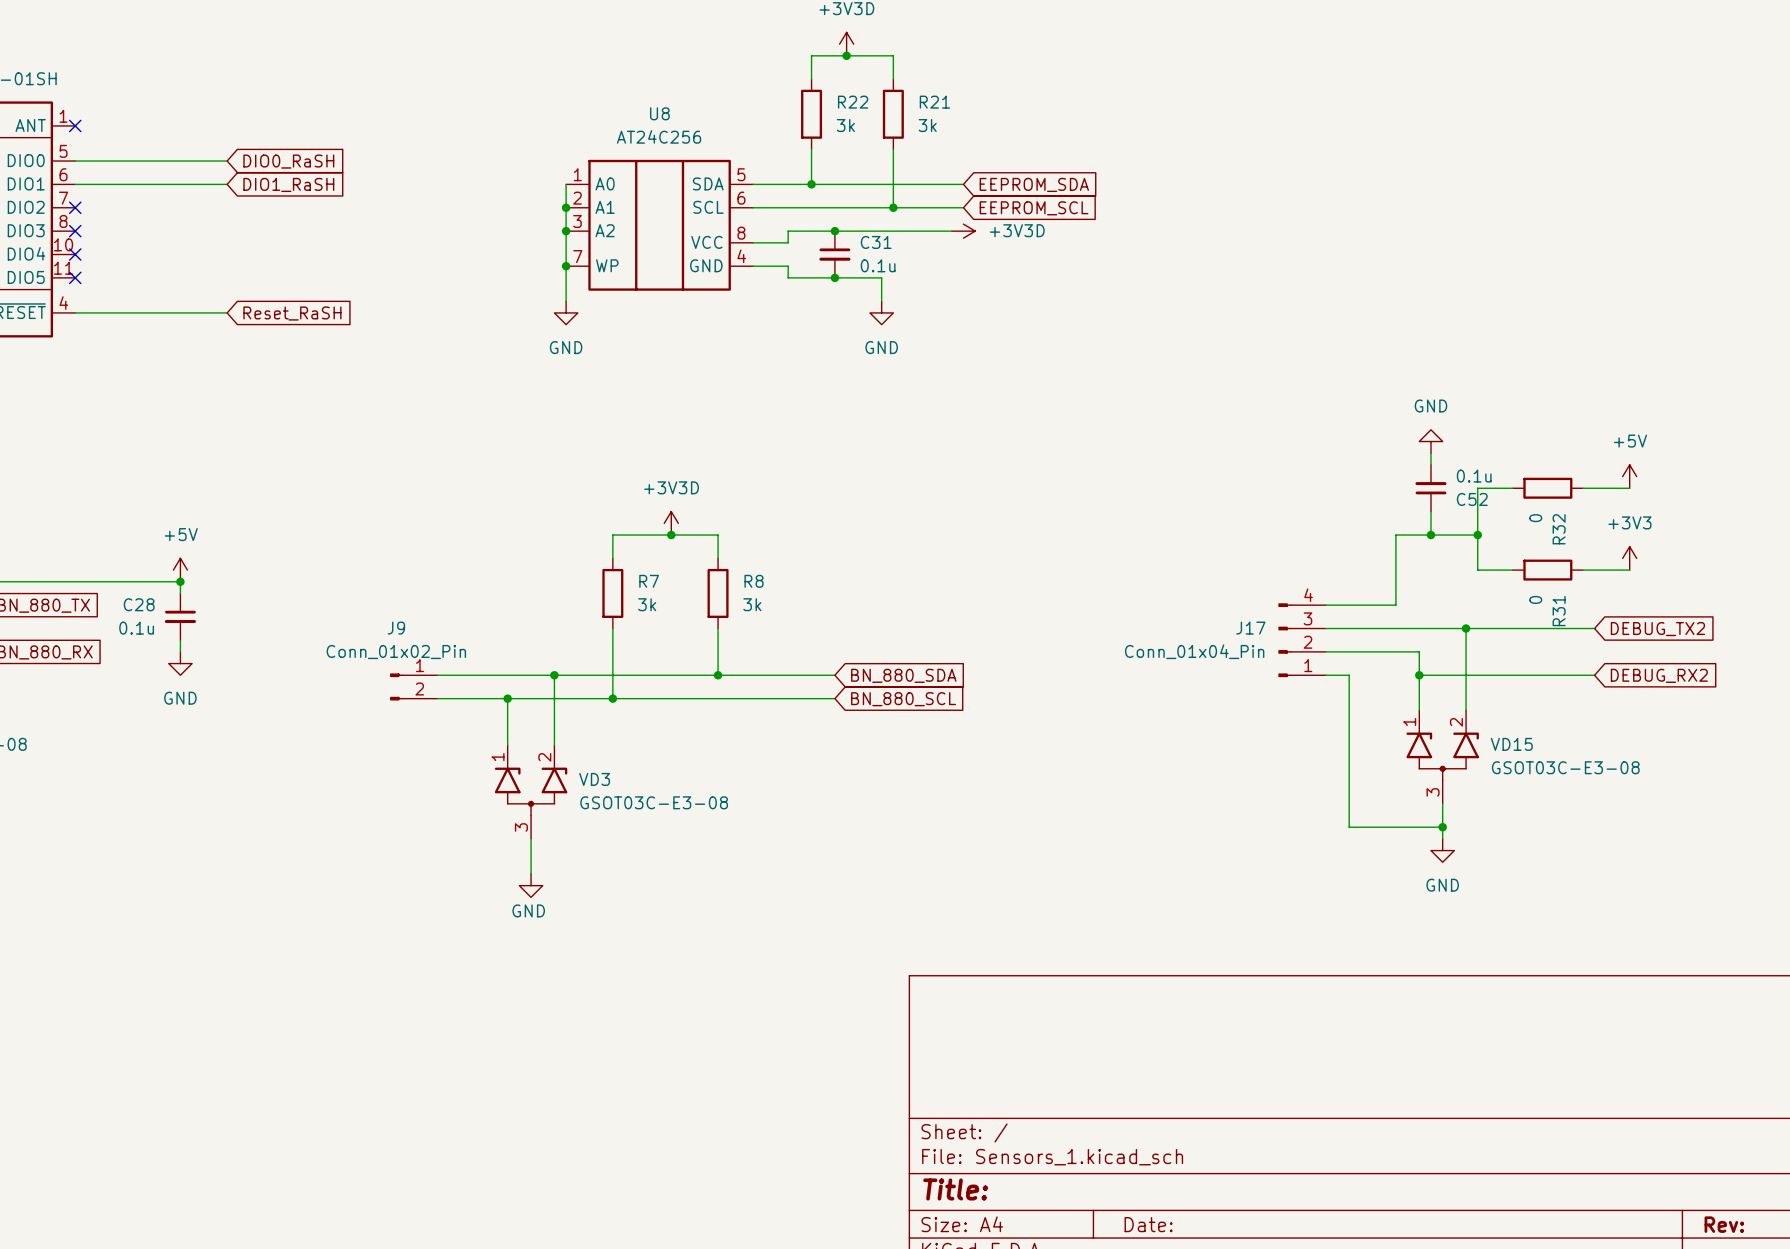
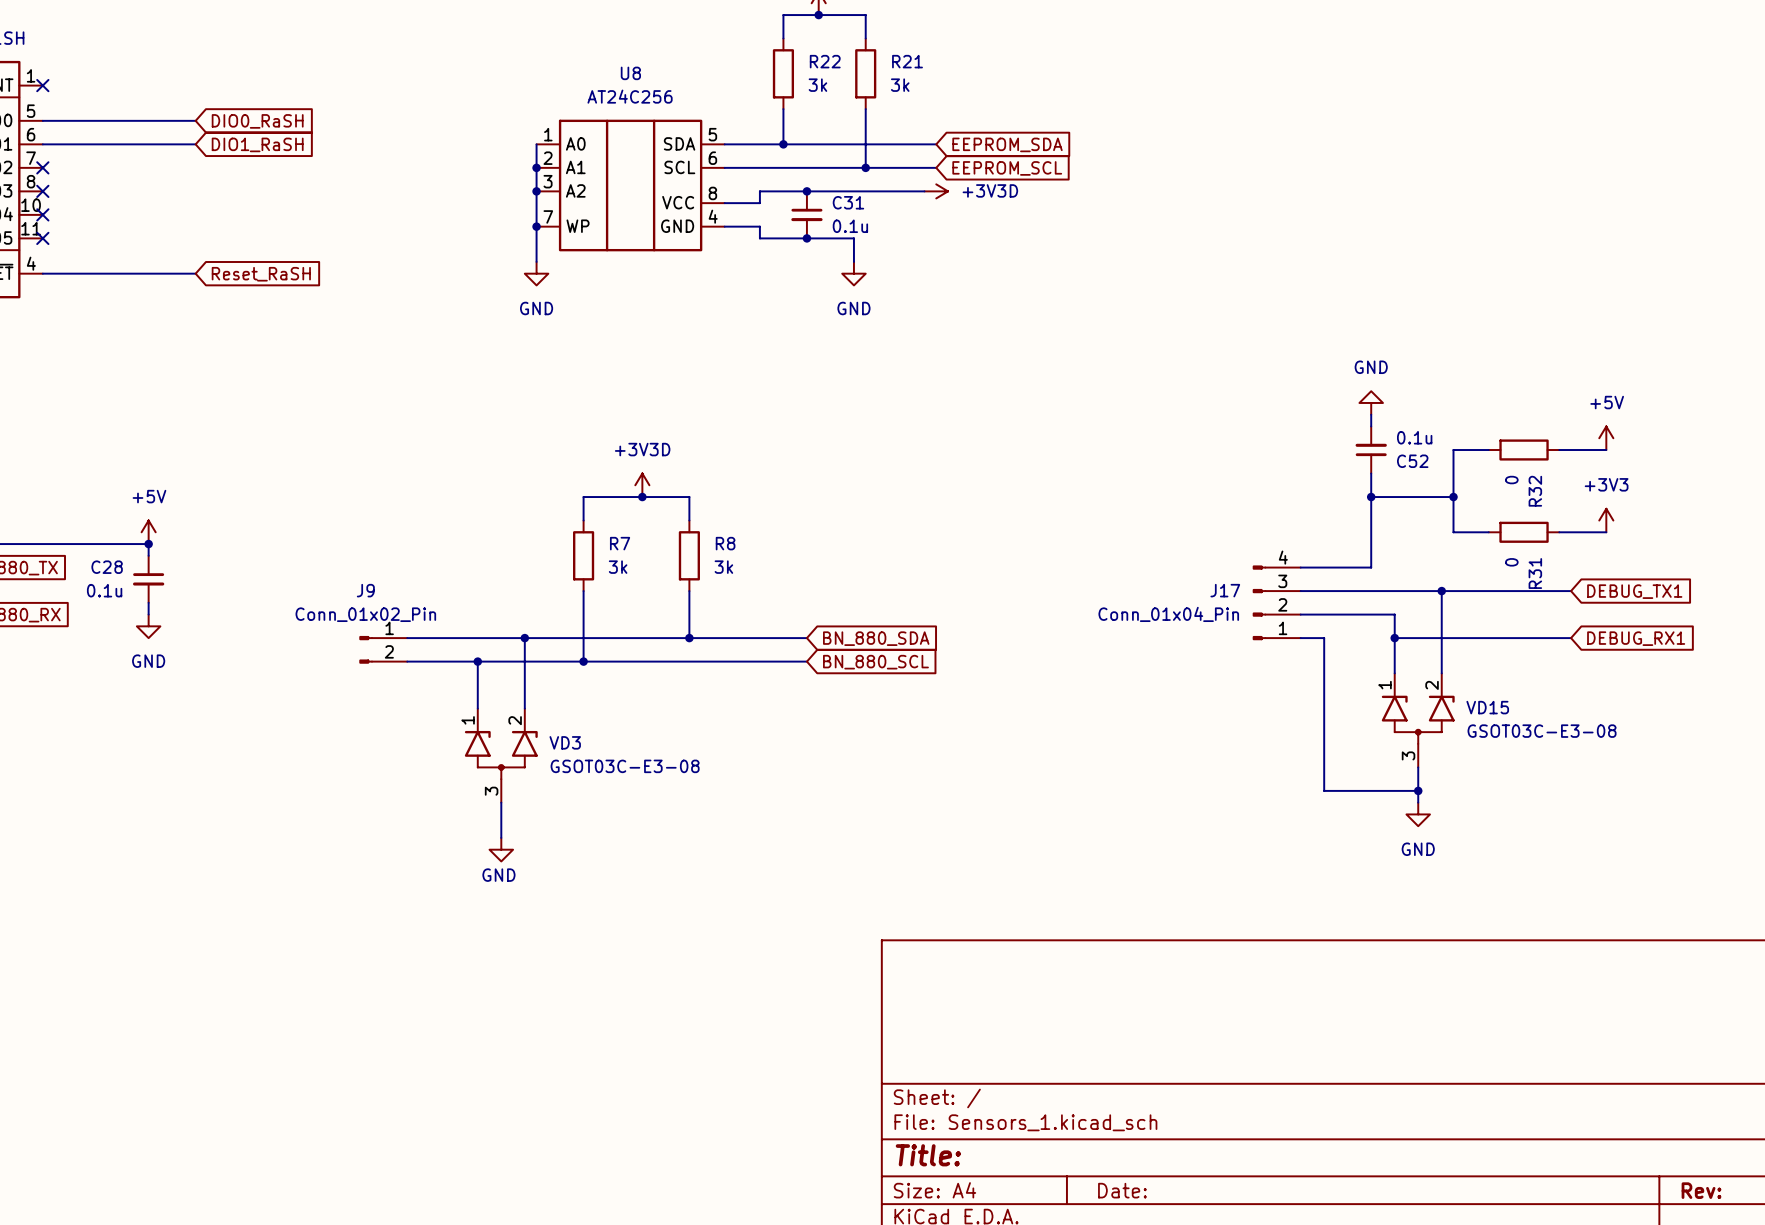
power symbol position: GND (1430, 441) -> GND (1371, 402)
wire: (1430, 453) (1430, 464) -> (1371, 414) (1371, 426)
C52 position: (1430, 488) -> (1371, 450)
wire: (1430, 511) (1430, 535) -> (1371, 473) (1371, 497)
junction position: (1430, 535) -> (1371, 497)
global label: DEBUG_TX2 (1657, 629) -> DEBUG_TX1 (1634, 591)
global label: DEBUG_RX2 (1659, 675) -> DEBUG_RX1 (1636, 638)

